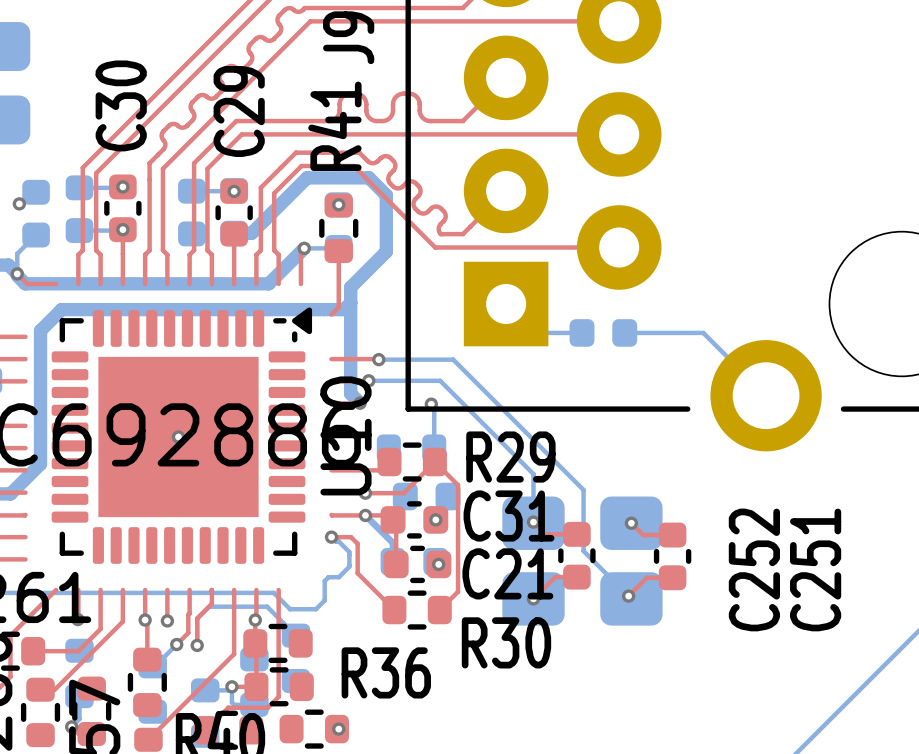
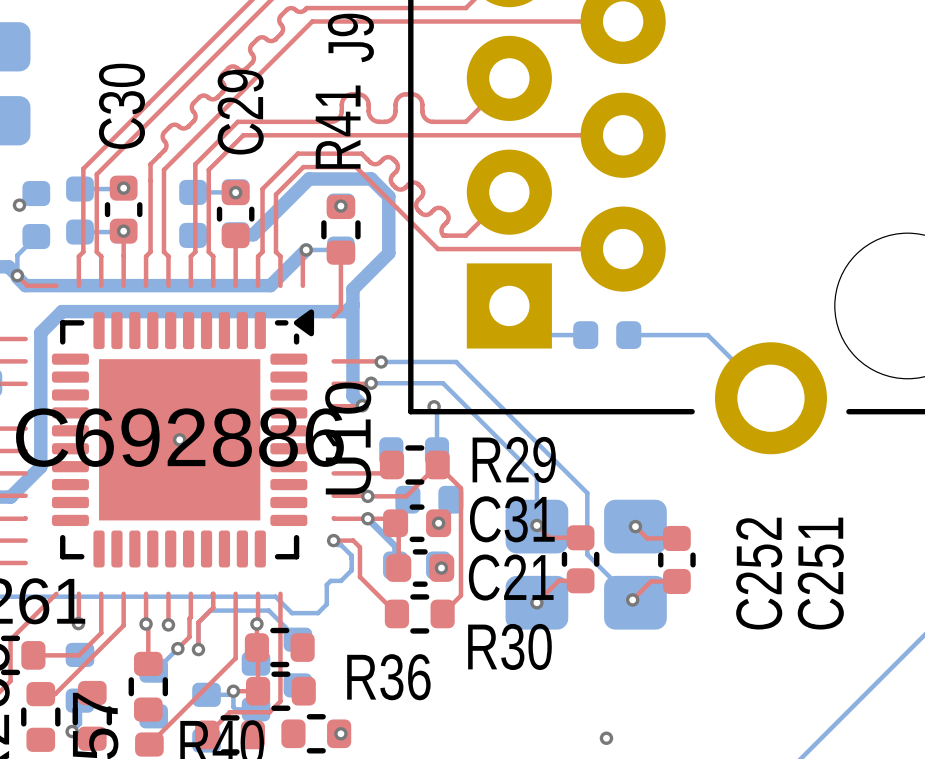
via: none -> (606, 738)

